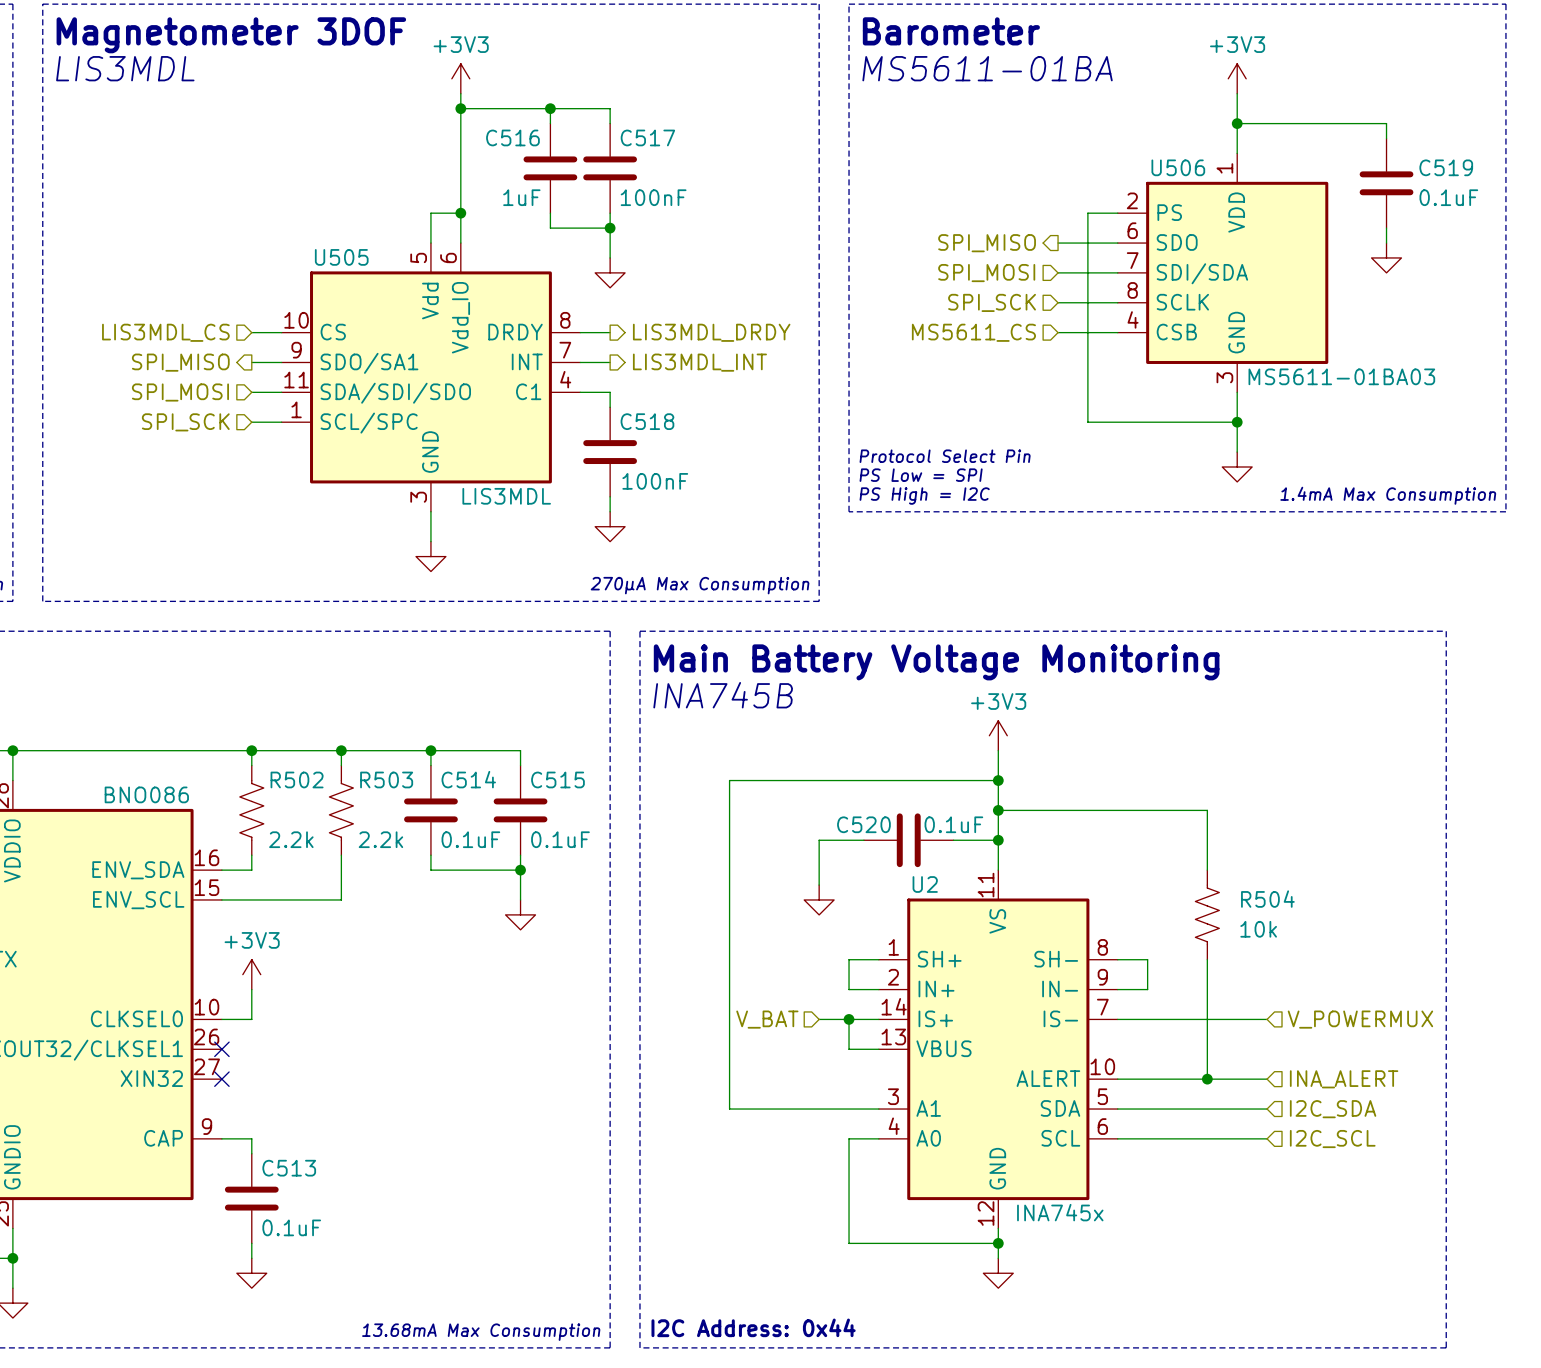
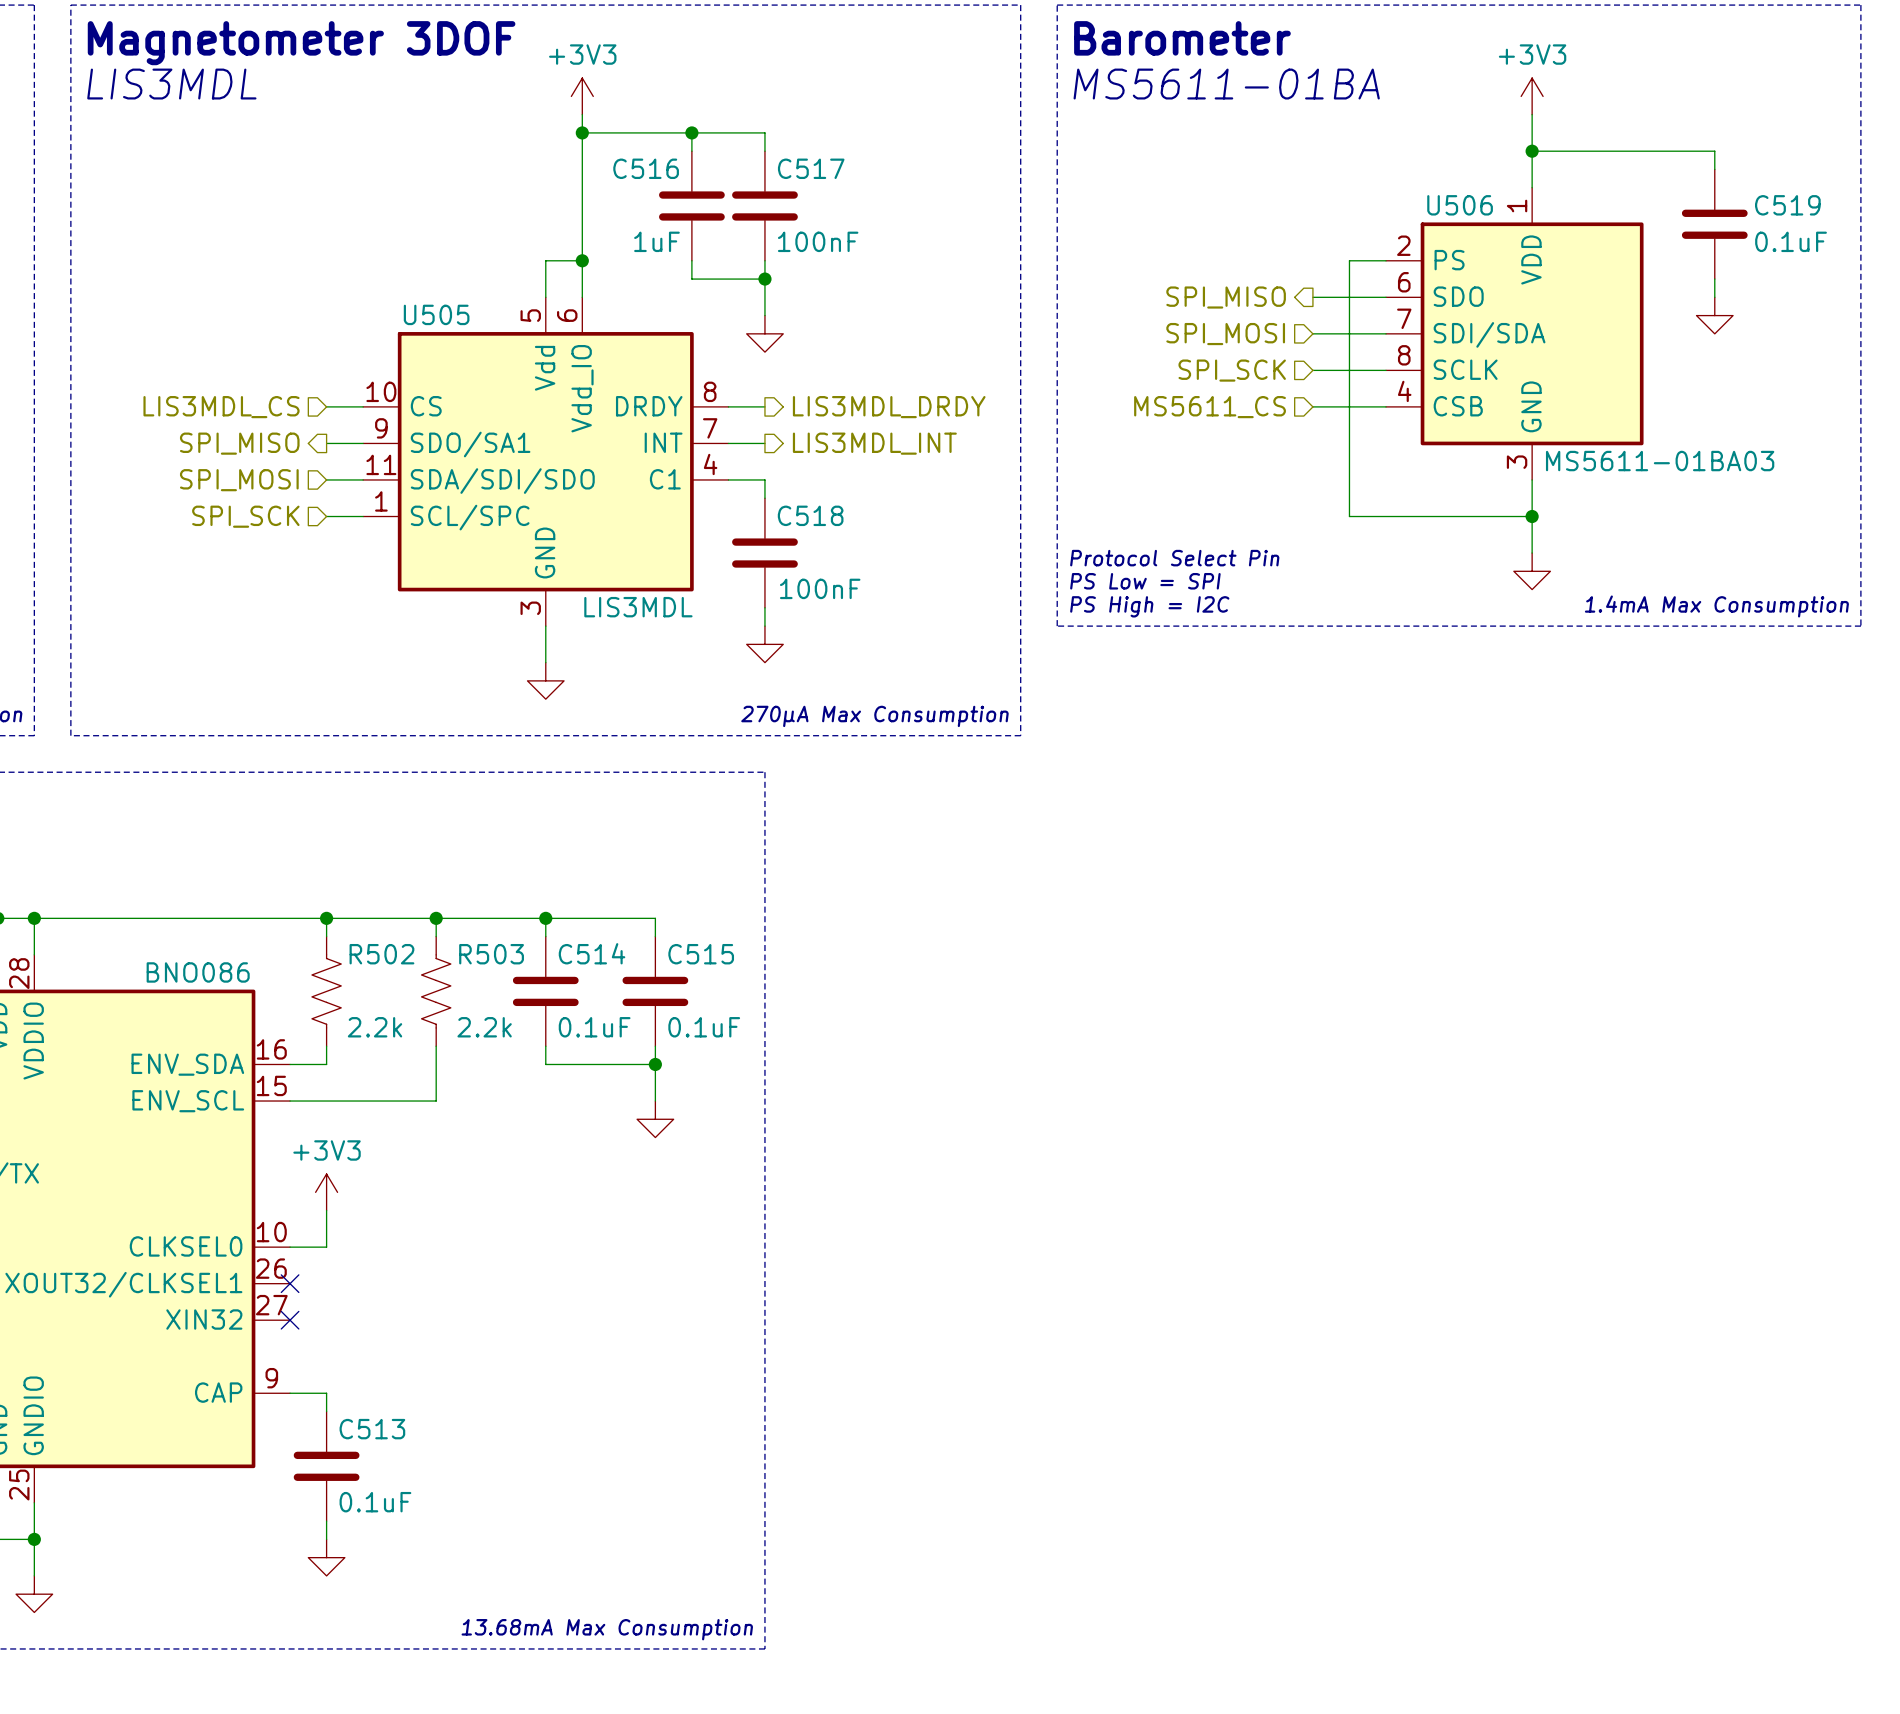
line: (639, 631) (1446, 631) (1446, 1347) (639, 1347) (639, 631) -> none
text: Main Battery Voltage Monitoring (936, 662) -> none
text: INA745B (723, 695) -> none
power symbol: +3V3 (998, 735) -> none
wire: (998, 750) (998, 870) -> none
wire: (998, 780) (729, 780) (729, 1109) (878, 1109) -> none
junction: (998, 780) -> none
wire: (998, 810) (1207, 810) (1207, 870) -> none
junction: (998, 810) -> none
wire: (863, 840) (819, 840) (819, 885) -> none
C520: 0.1uF (908, 840) -> none
wire: (953, 840) (998, 840) -> none
junction: (998, 840) -> none
power symbol: (819, 899) -> none
R504: 10k (1207, 914) -> none
wire: (878, 959) (849, 959) (849, 989) (878, 989) -> none
wire: (1117, 959) (1147, 959) (1147, 989) (1117, 989) -> none
wire: (1207, 959) (1207, 1079) -> none
hierarchical label: V_BAT (767, 1019) -> none
wire: (819, 1019) (878, 1019) -> none
wire: (849, 1019) (849, 1049) (878, 1049) -> none
junction: (849, 1019) -> none
wire: (1117, 1019) (1267, 1019) -> none
hierarchical label: V_POWERMUX (1360, 1019) -> none
U2: INA745x (998, 1049) -> none
wire: (1117, 1079) (1267, 1079) -> none
junction: (1207, 1079) -> none
hierarchical label: INA_ALERT (1344, 1079) -> none
wire: (1117, 1109) (1267, 1109) -> none
hierarchical label: I2C_SDA (1333, 1109) -> none
wire: (878, 1138) (849, 1138) (849, 1243) (998, 1243) -> none
wire: (1117, 1138) (1267, 1138) -> none
hierarchical label: I2C_SCL (1332, 1139) -> none
wire: (998, 1228) (998, 1258) -> none
junction: (998, 1243) -> none
power symbol: (998, 1273) -> none
text: I2C Address: 0x44 (753, 1327) -> none

